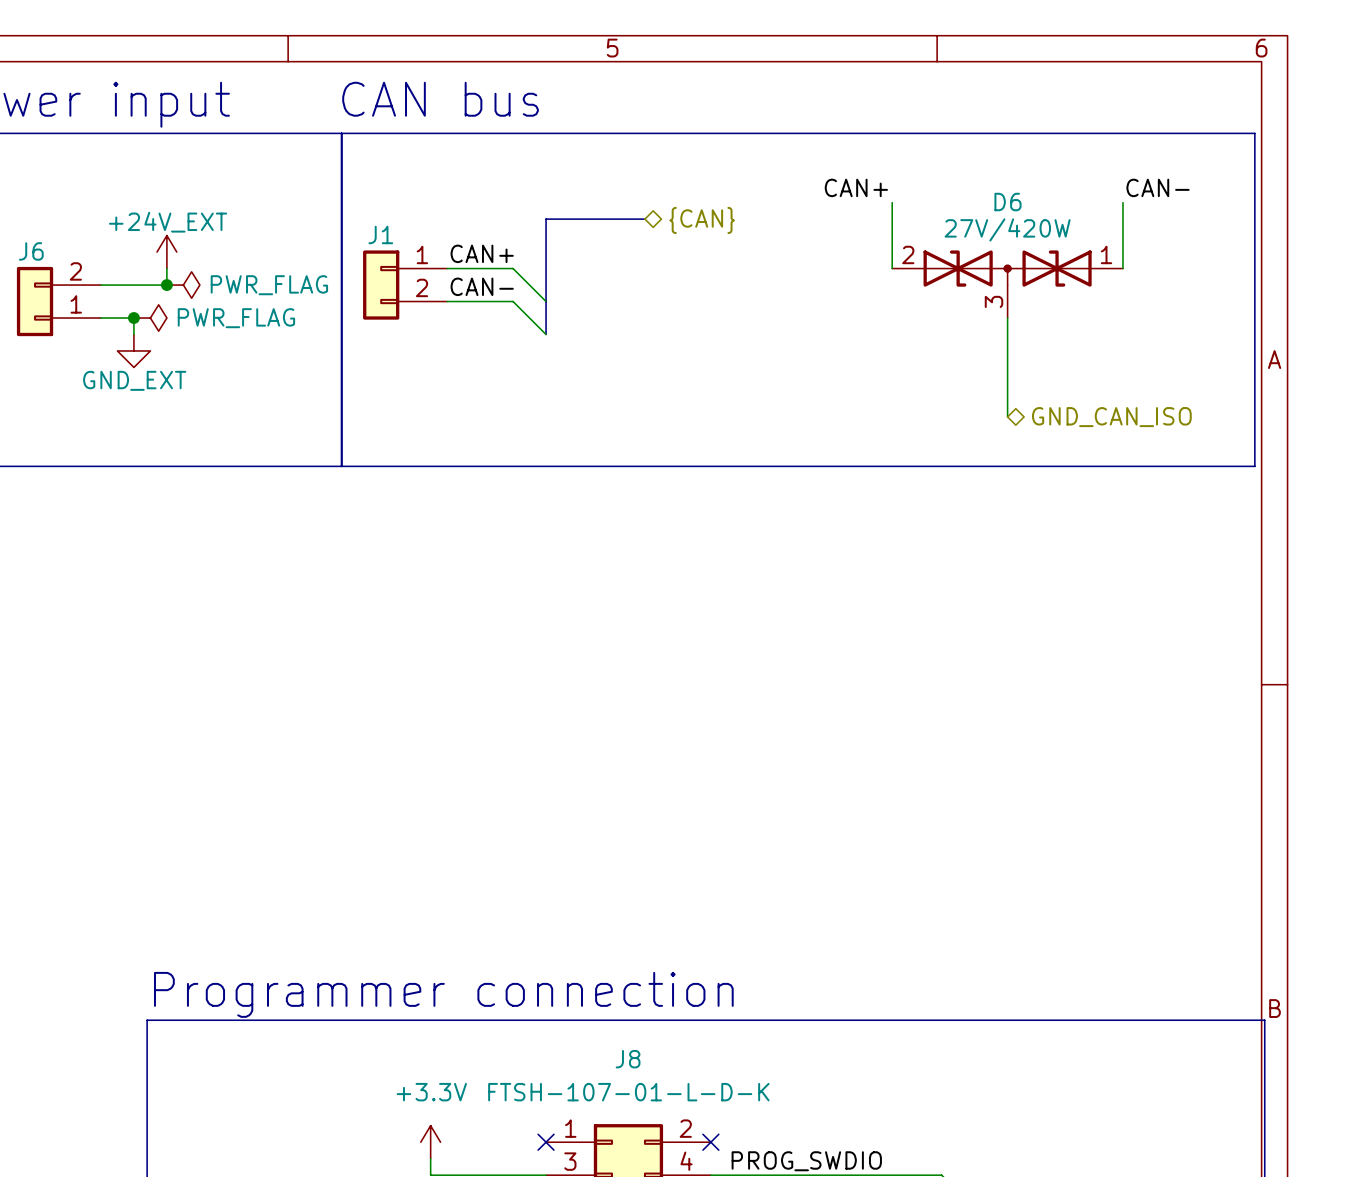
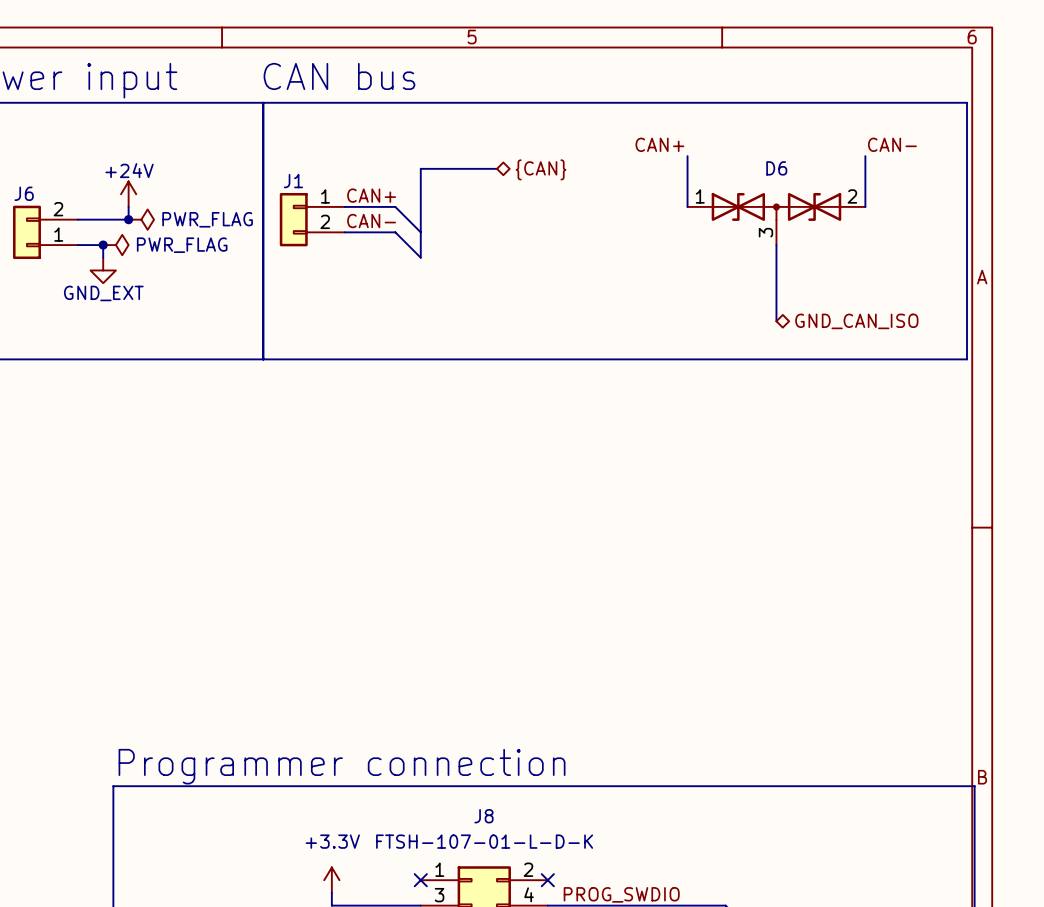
D6 value: 27V/420W (1007, 229) -> none
power symbol: +24V_EXT (166, 252) -> +24V (128, 194)
D6 flip: as is (1007, 268) -> left-right (776, 206)

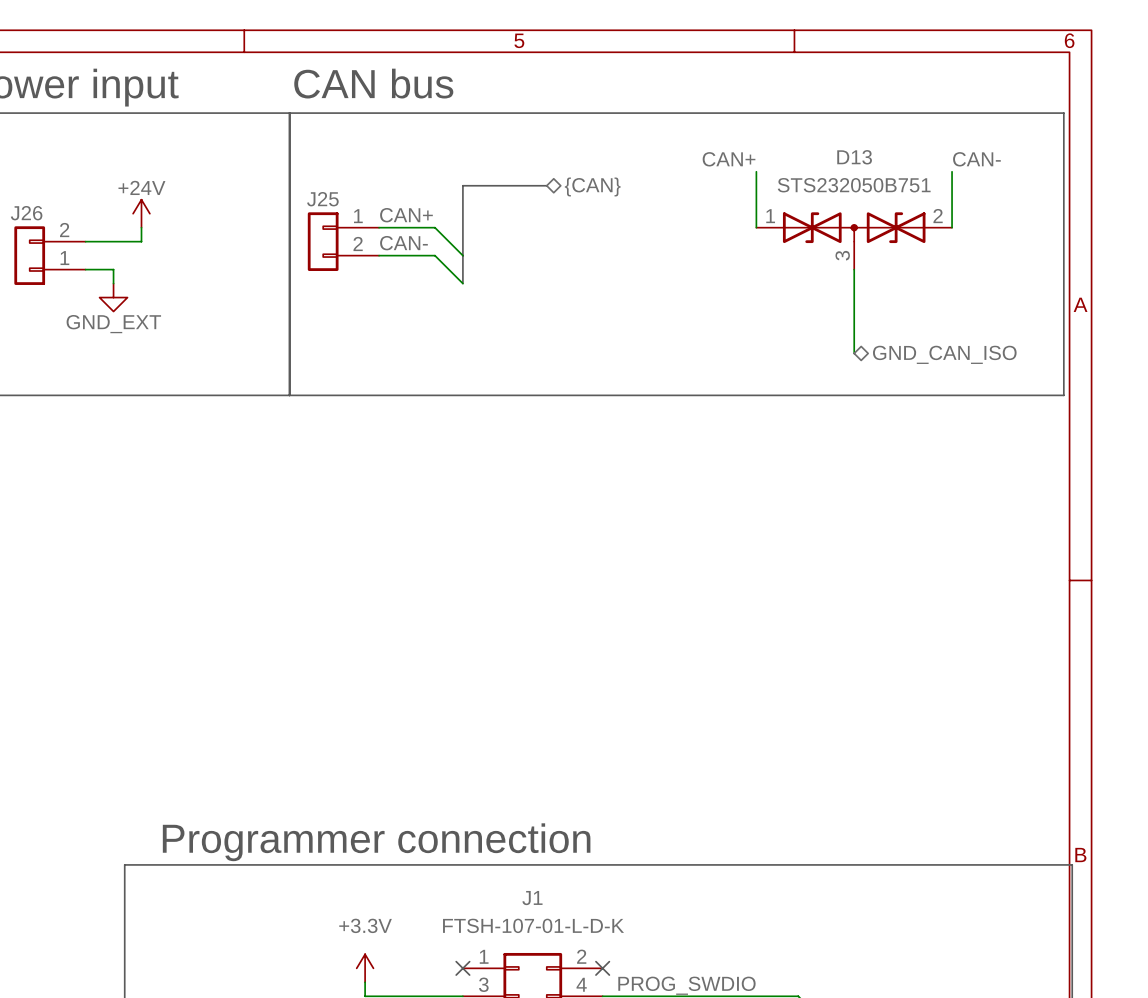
D6 name: D6 (776, 168) -> D13 (854, 157)
D6 value: none -> STS232050B751 (854, 185)
J1 name: J1 (293, 181) -> J25 (322, 199)
J6 name: J6 (24, 193) -> J26 (26, 213)
junction: (128, 219) -> none
power symbol: PWR_FLAG (141, 219) -> none
junction: (103, 245) -> none
power symbol: PWR_FLAG (115, 245) -> none
J8 name: J8 (483, 816) -> J1 (532, 898)

